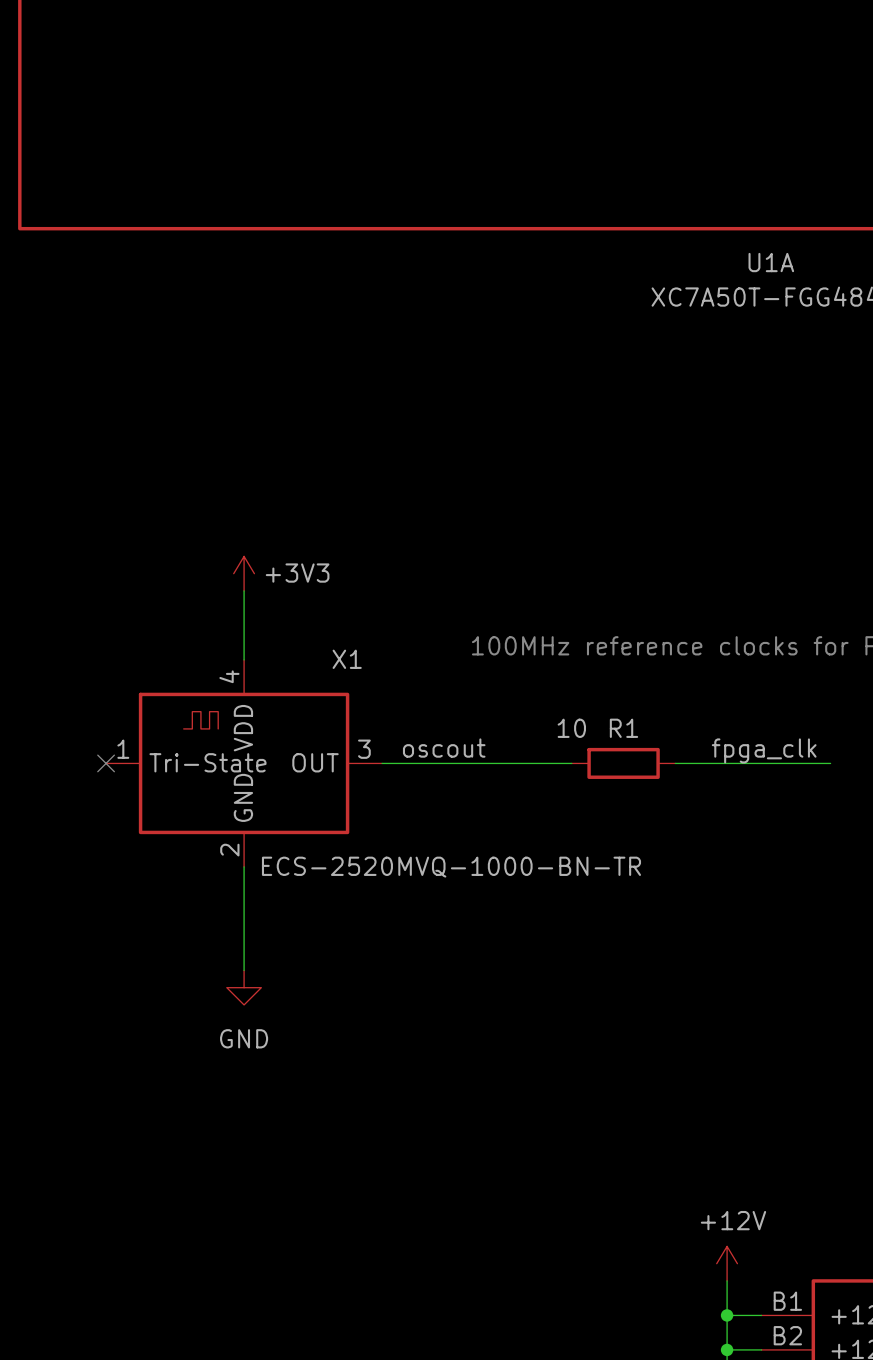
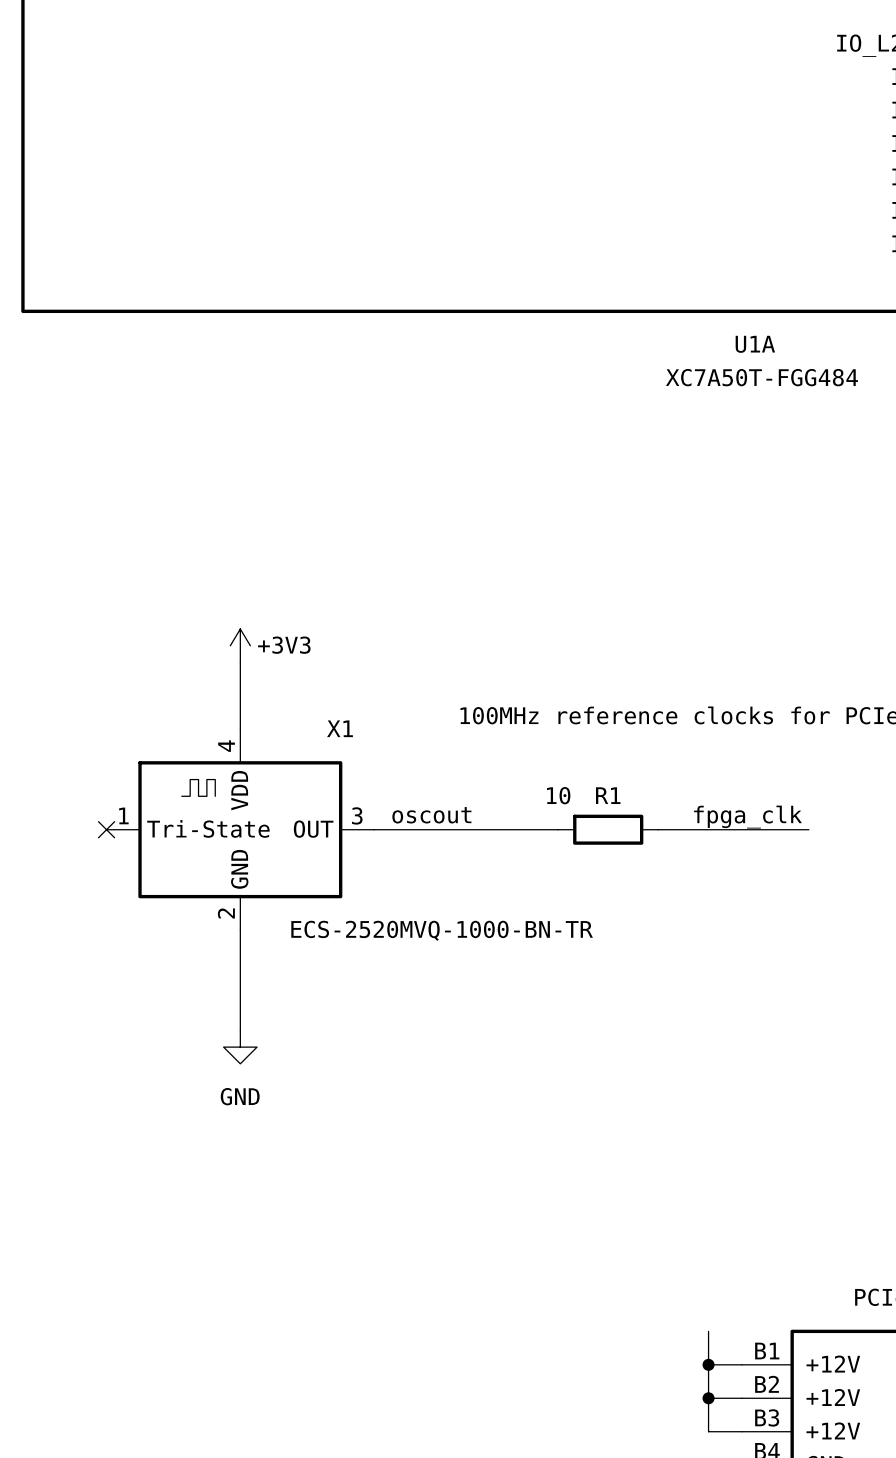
power symbol: +12V (727, 1263) -> none

